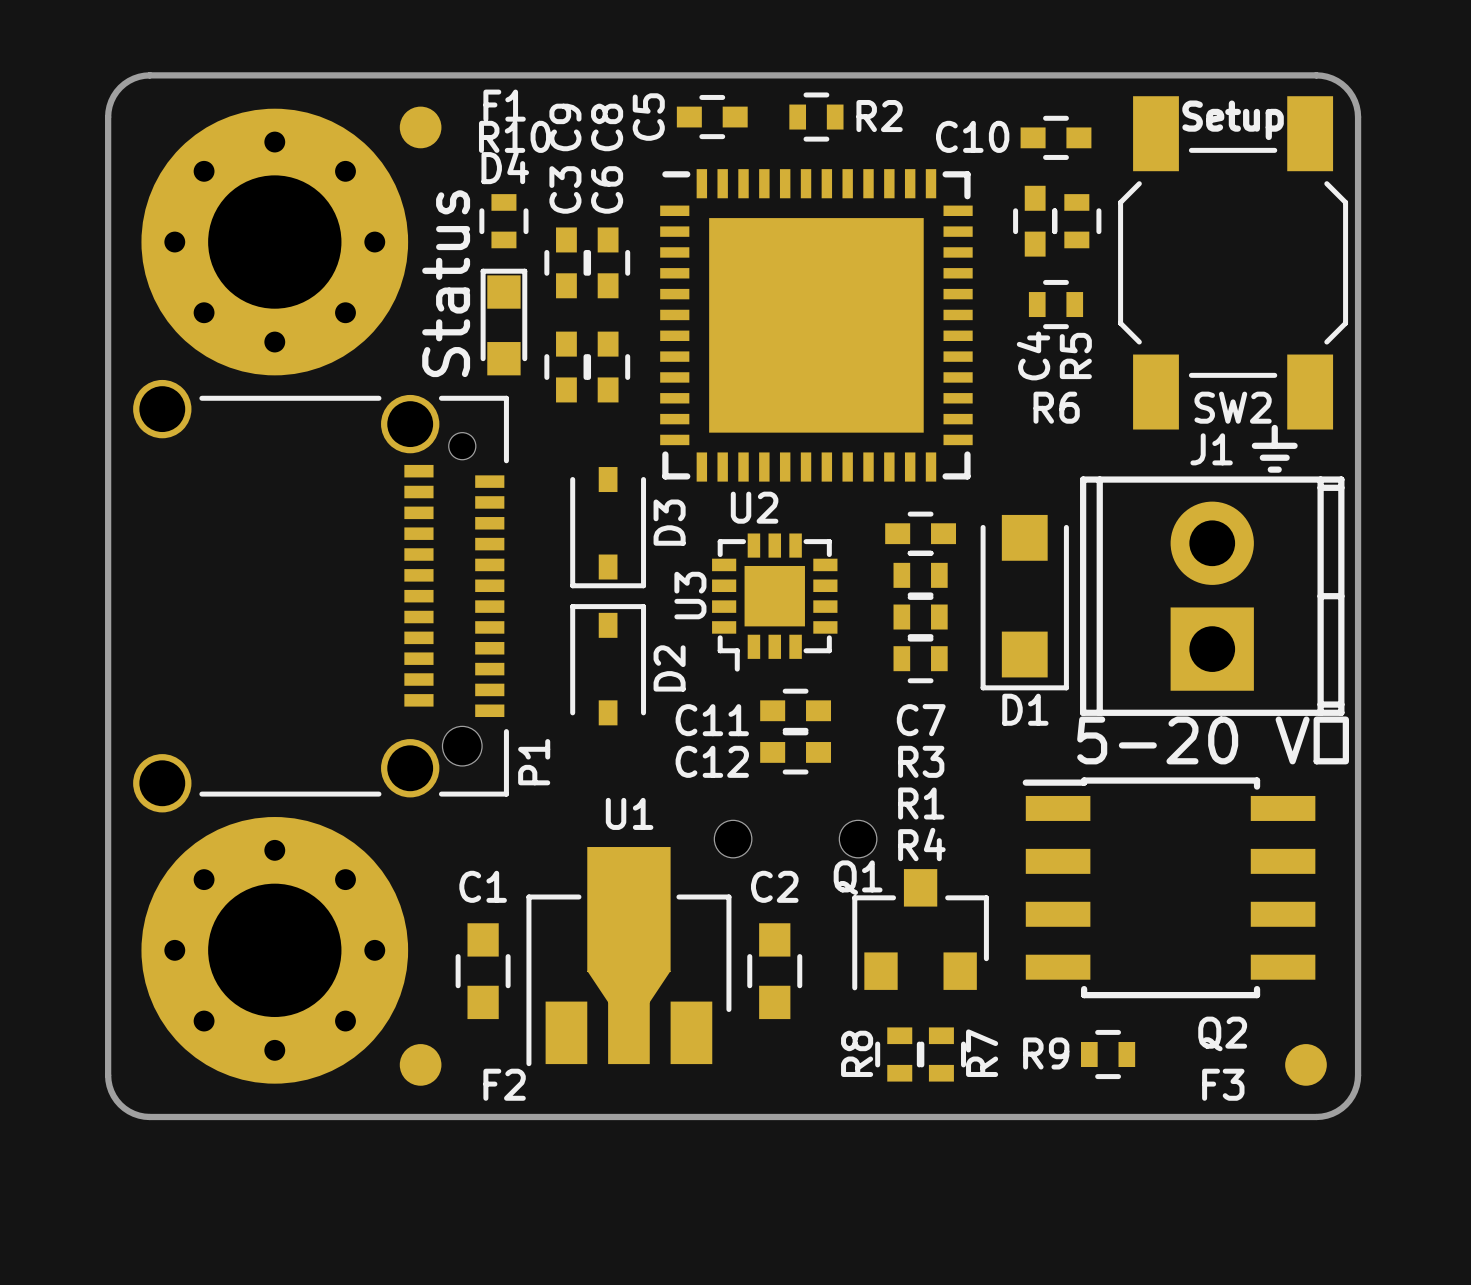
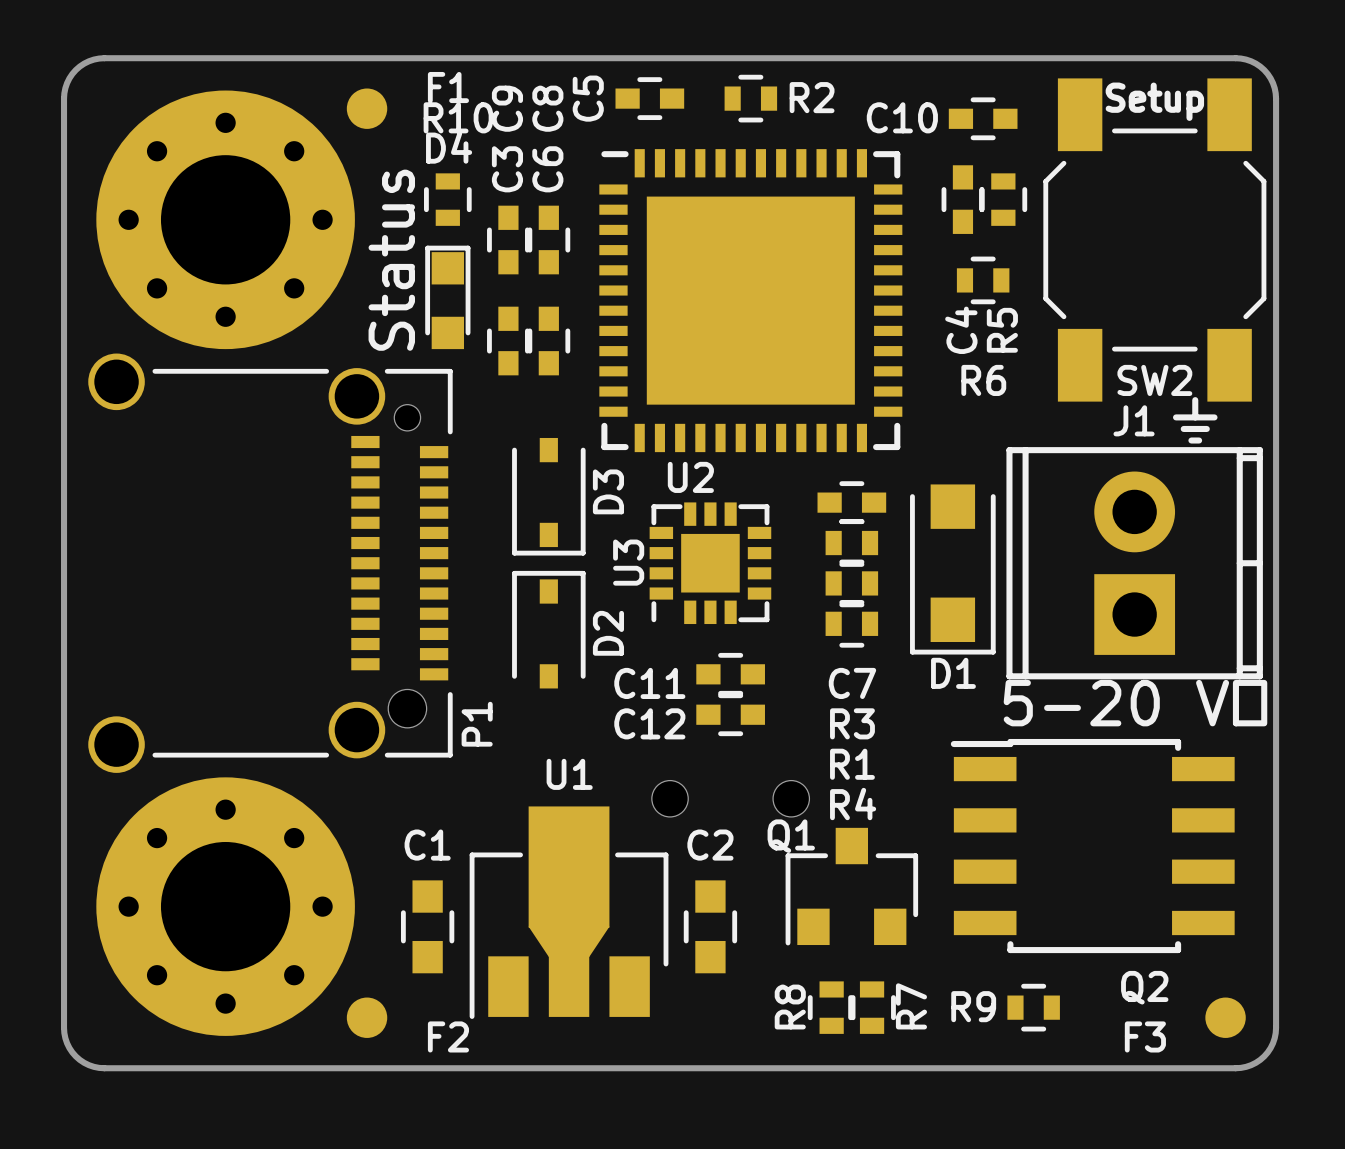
U3 footprint: [712, 533, 838, 672] -> [649, 502, 772, 625]

